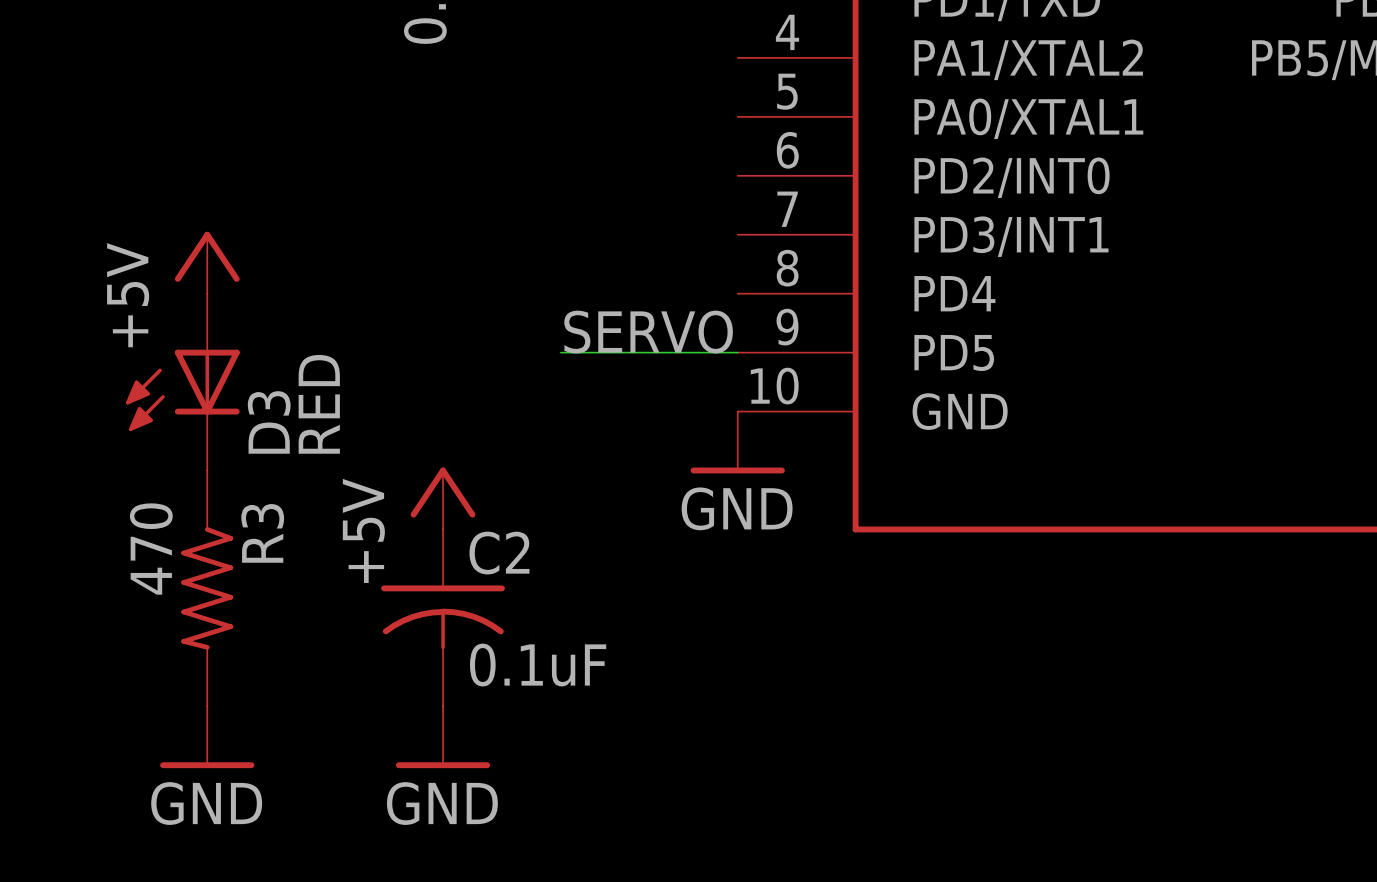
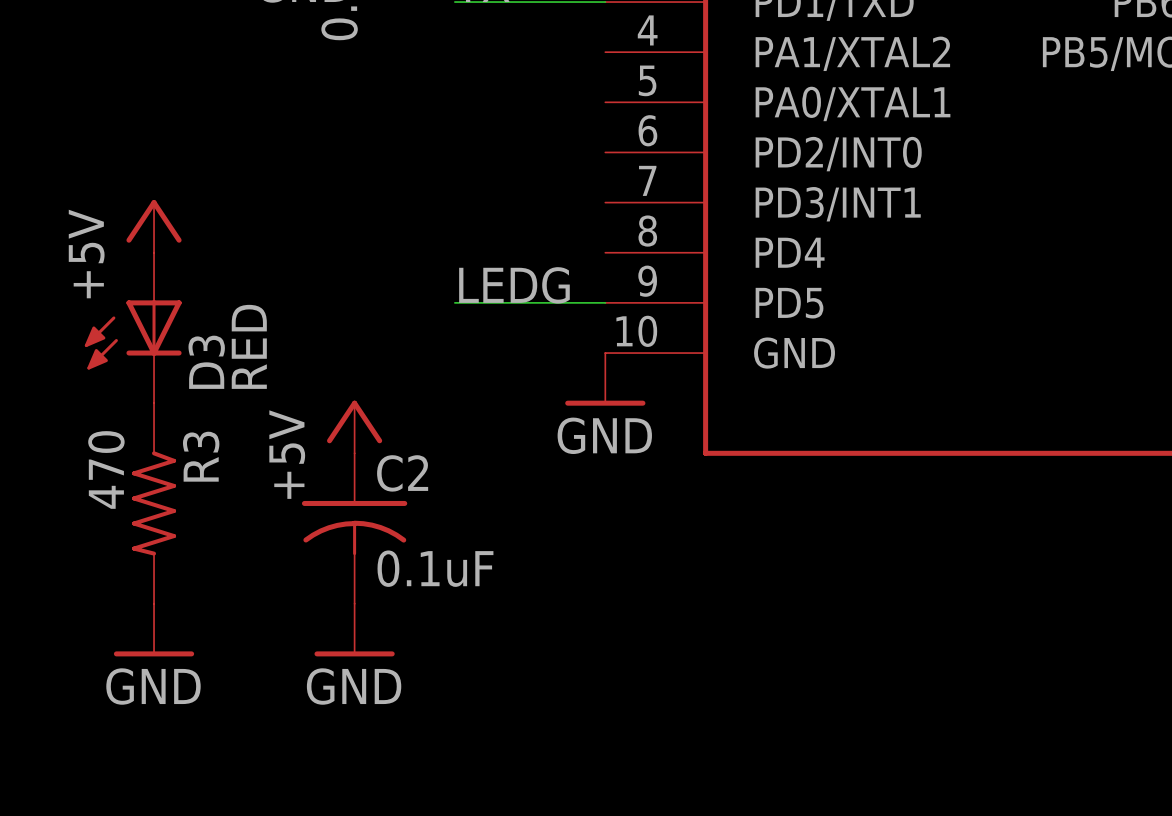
label: SERVO (648, 332) -> LEDG (514, 285)

